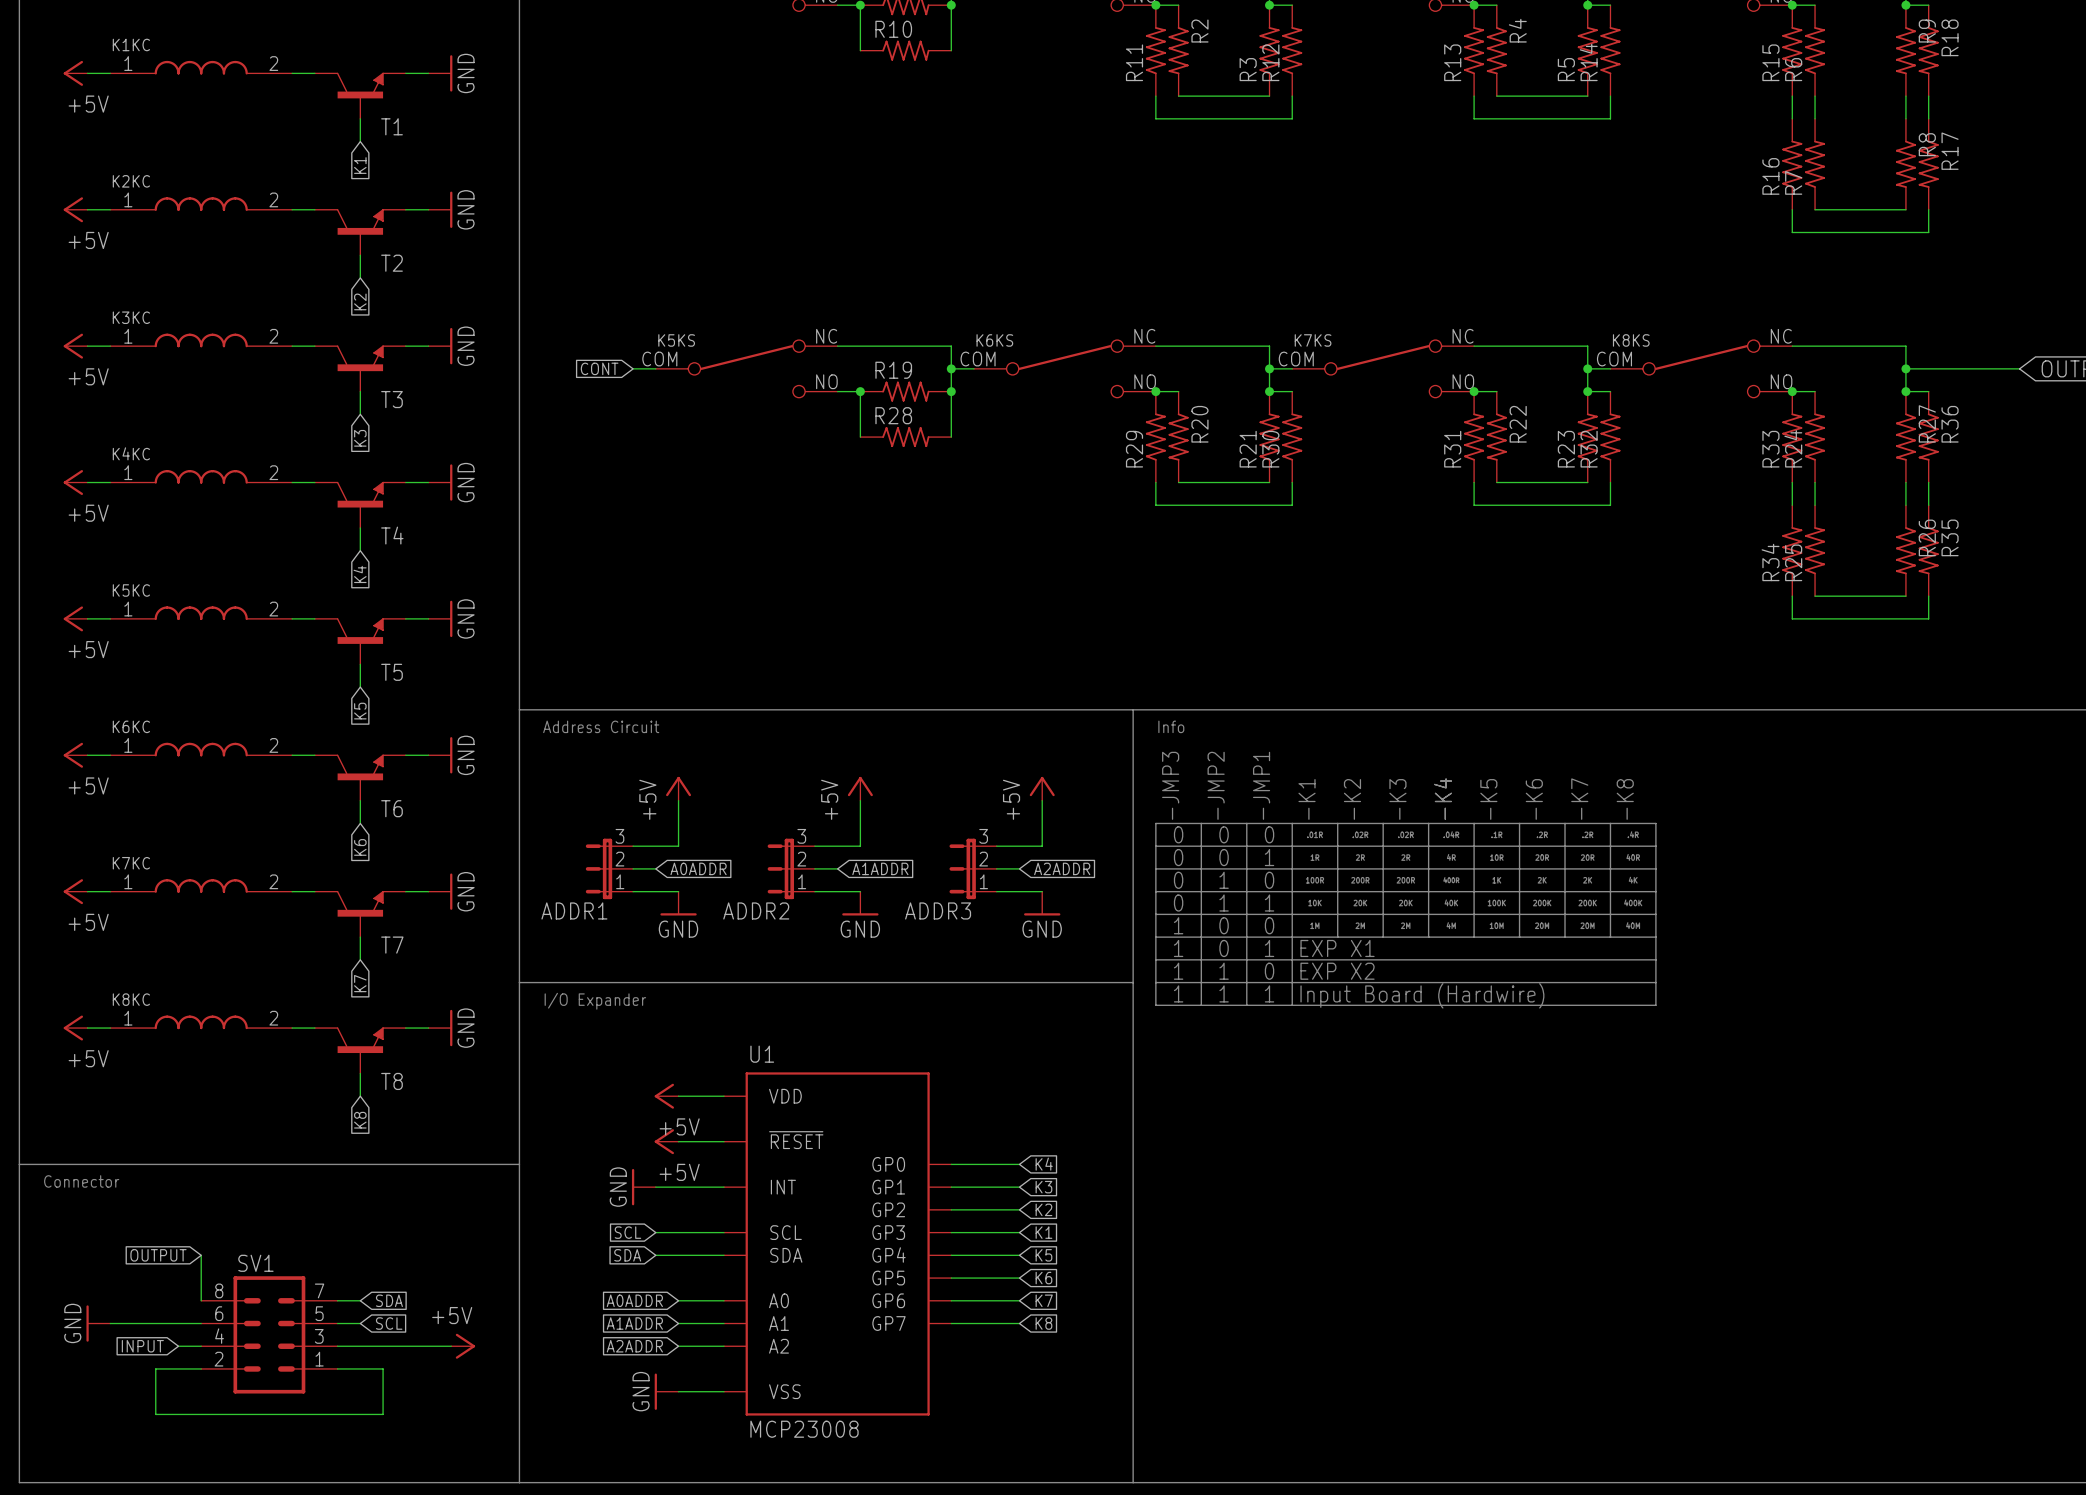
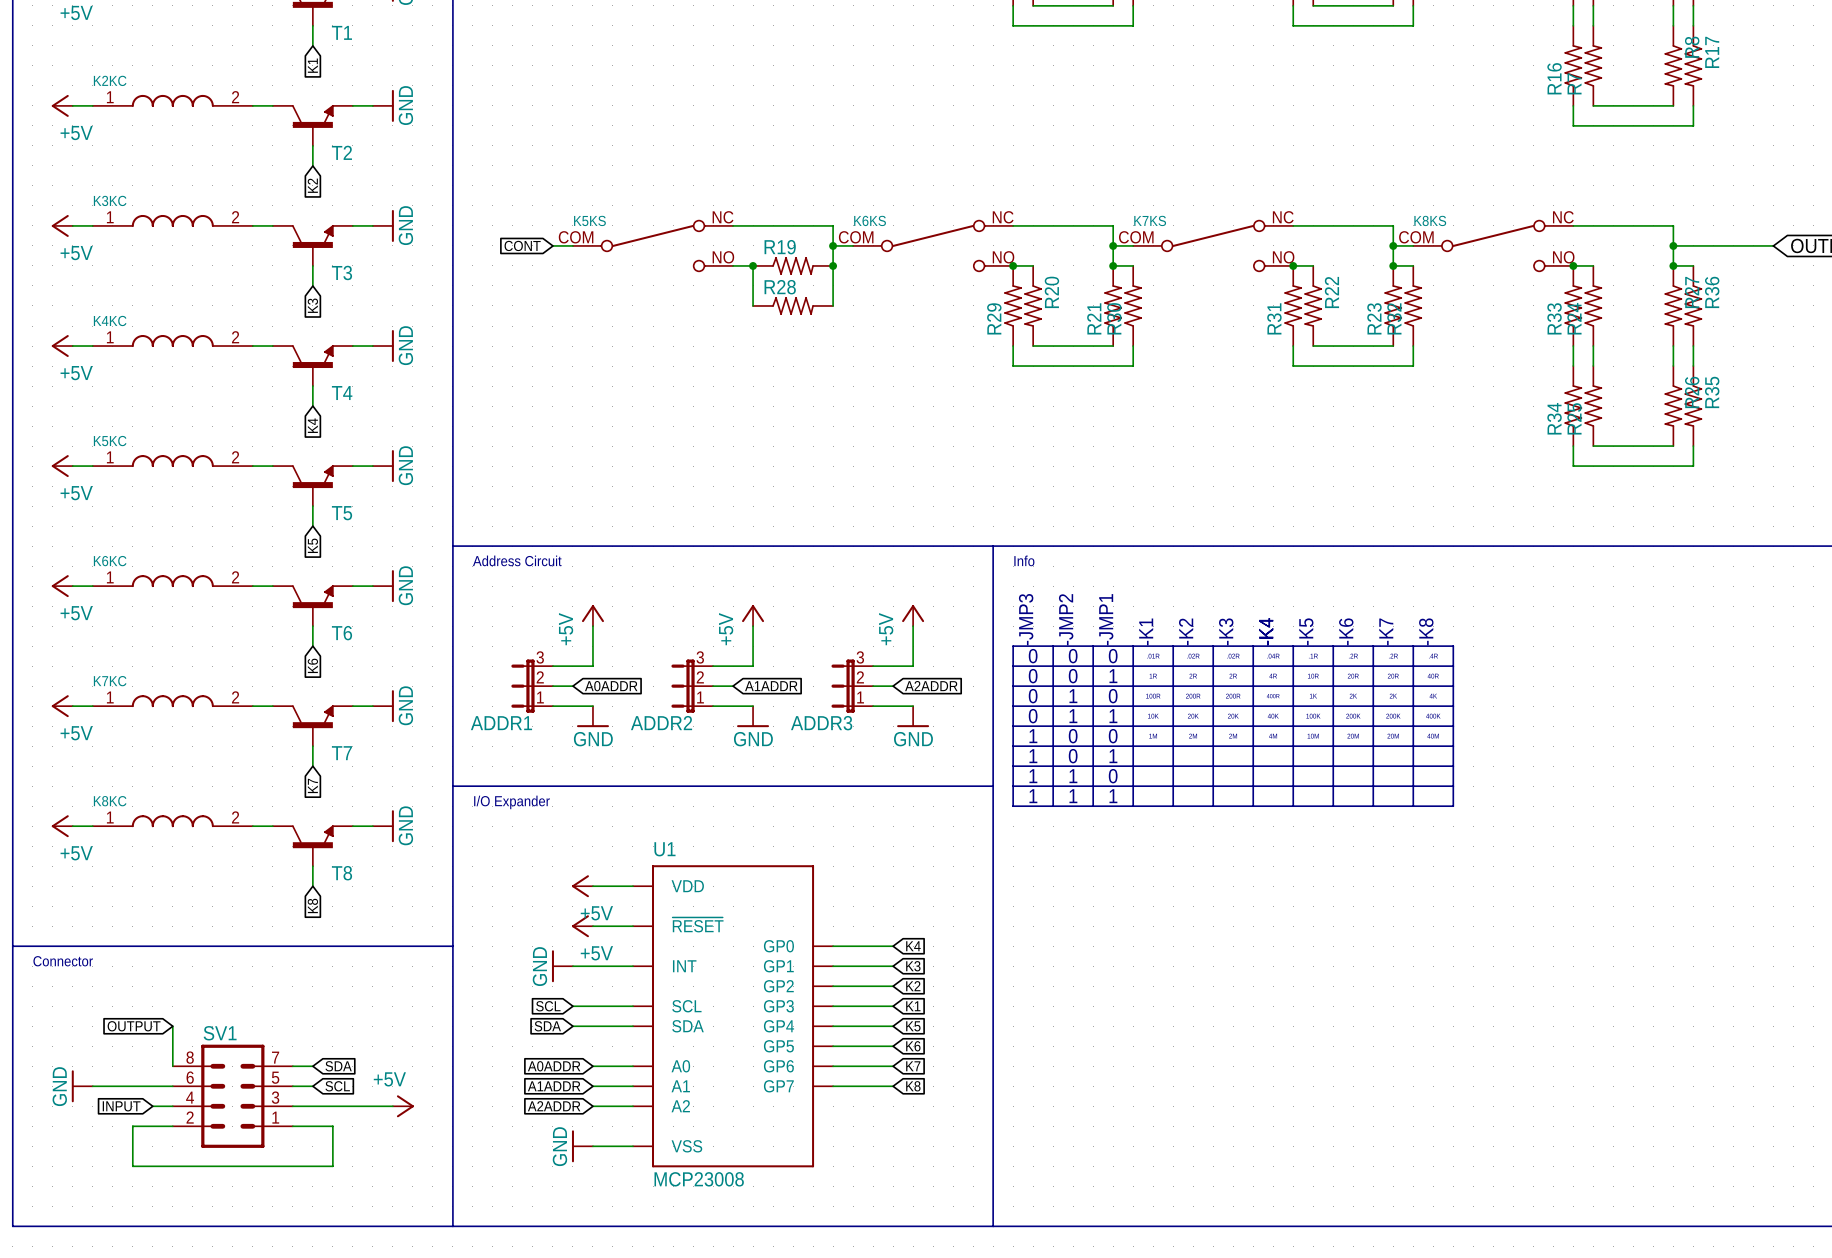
line: none -> (1173, 746) (1173, 806)
line: none -> (1213, 746) (1213, 806)
line: none -> (1253, 746) (1253, 806)
line: none -> (1293, 746) (1293, 806)
line: none -> (1333, 746) (1333, 806)
line: none -> (1373, 746) (1373, 806)
line: none -> (1413, 746) (1413, 806)
text: EXP X1 (1337, 948) -> none
text: EXP X2 (1337, 971) -> none
text: Input Board (Hardwire) (1422, 995) -> none

